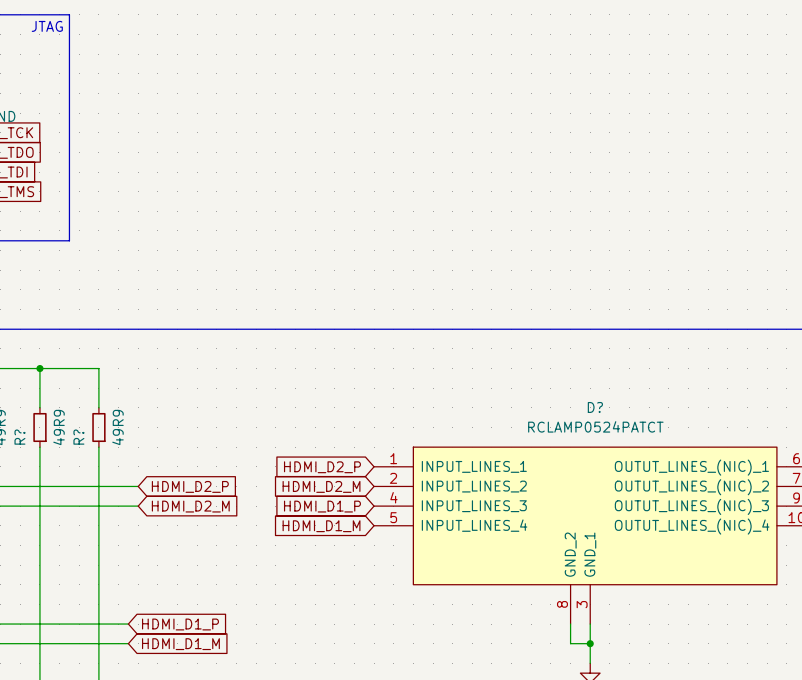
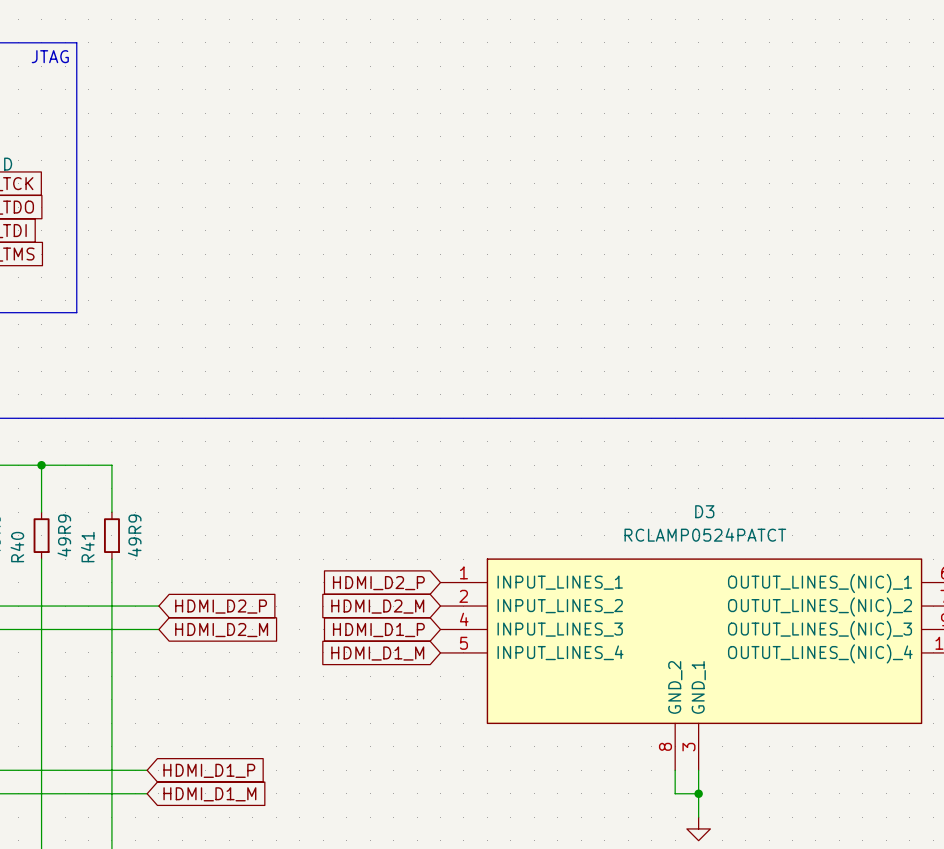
D? name: D? (595, 407) -> D3 (704, 511)
R? name: R? (19, 437) -> R40 (17, 547)
R? name: R? (78, 437) -> R41 (87, 547)

